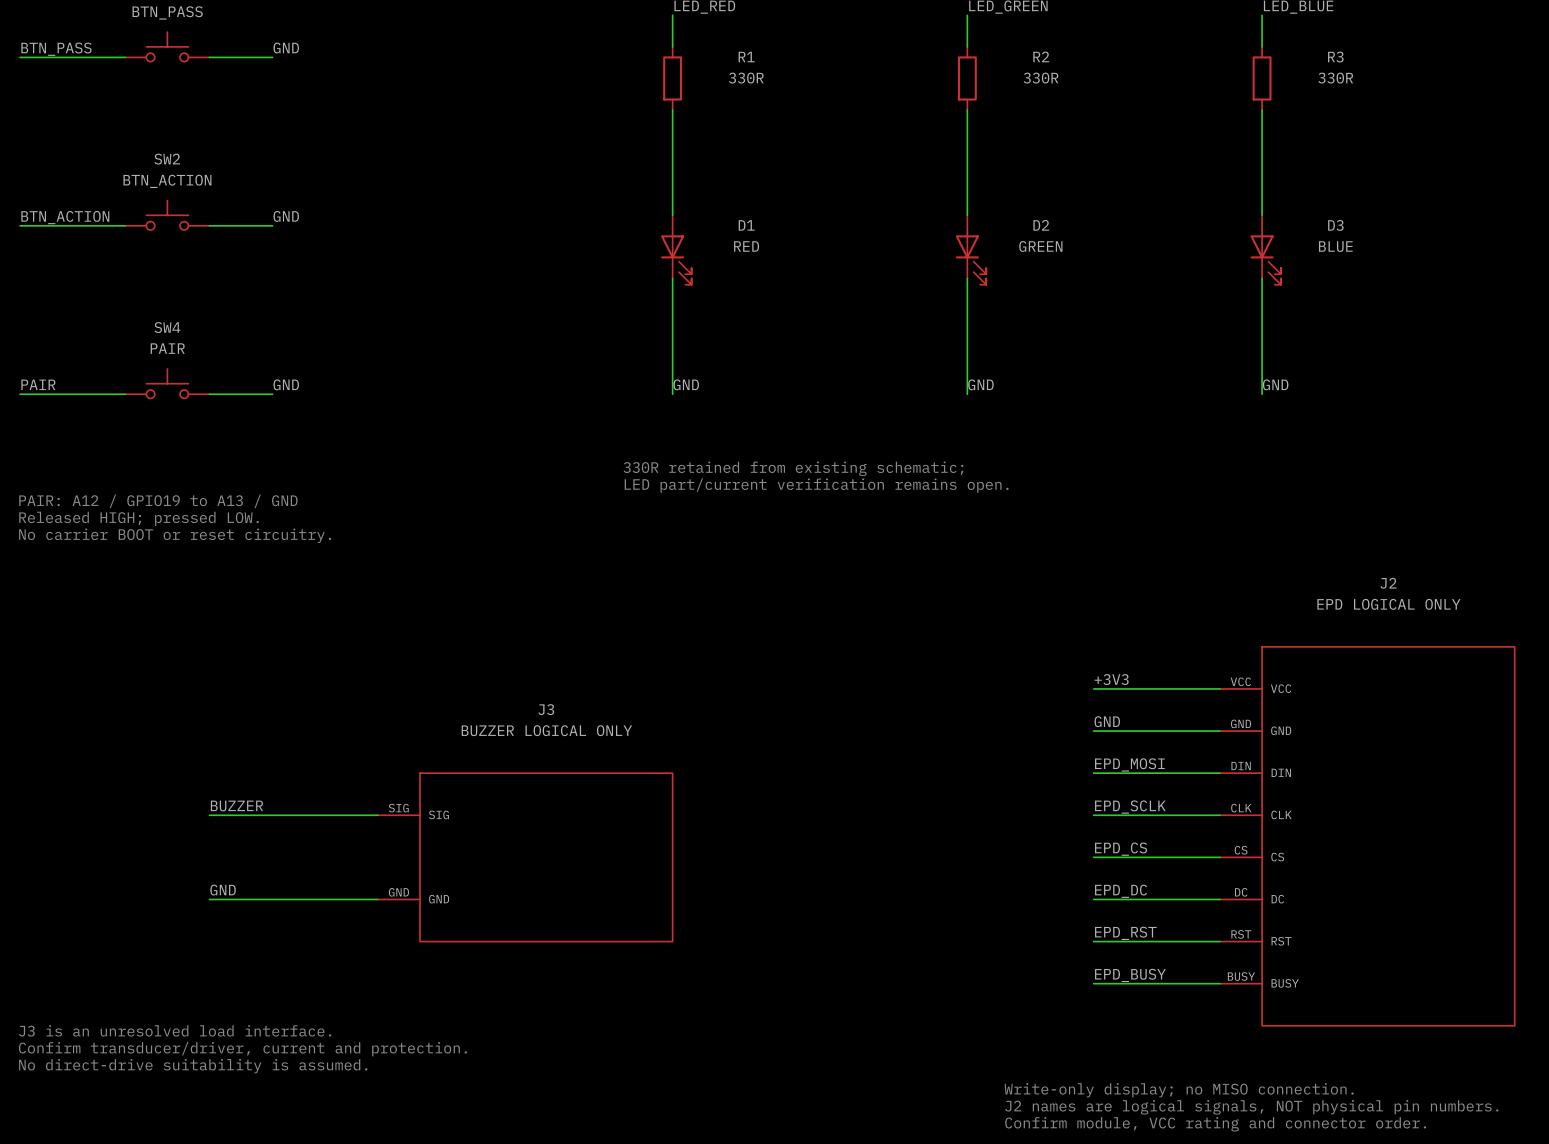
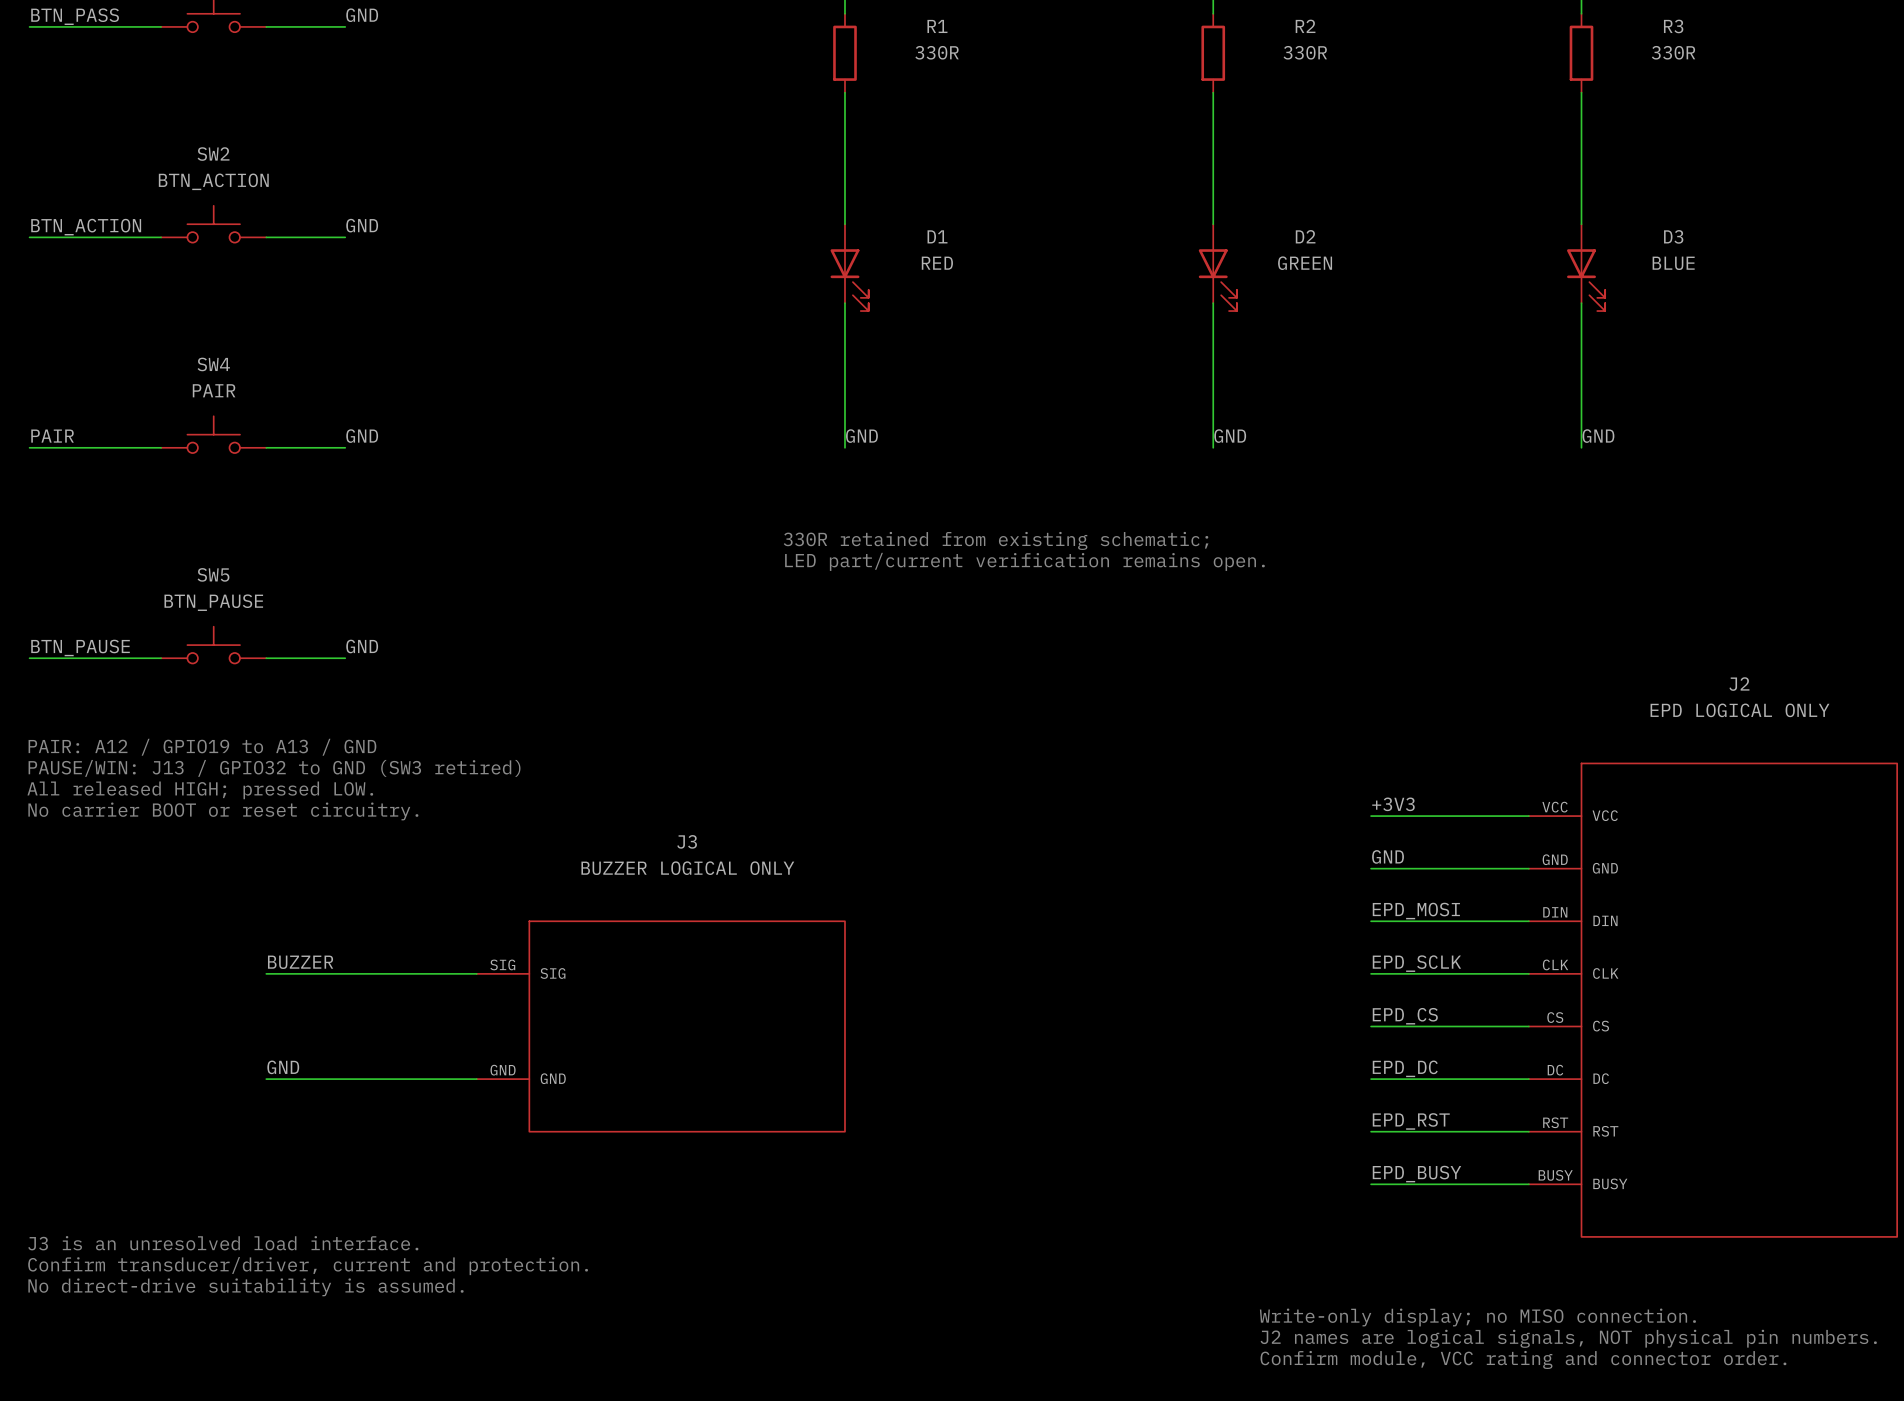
text position: PAIR: A12 / GPIO19 to A13 / GND (158, 501) -> PAIR: A12 / GPIO19 to A13 / GND (202, 747)
text: Released HIGH; pressed LOW. (139, 518) -> none
text position: No carrier BOOT or reset circuitry. (175, 535) -> No carrier BOOT or reset circuitry. (223, 811)
SW5: none -> BTN_PAUSE (213, 645)
label: none -> GND (362, 646)
label: none -> BTN_PAUSE (80, 647)
wire: none -> (29, 658) (161, 658)
wire: none -> (266, 658) (345, 658)
text: none -> PAUSE/WIN: J13 / GPIO32 to GND (SW3 retired) (274, 768)
text: none -> All released HIGH; pressed LOW. (200, 790)

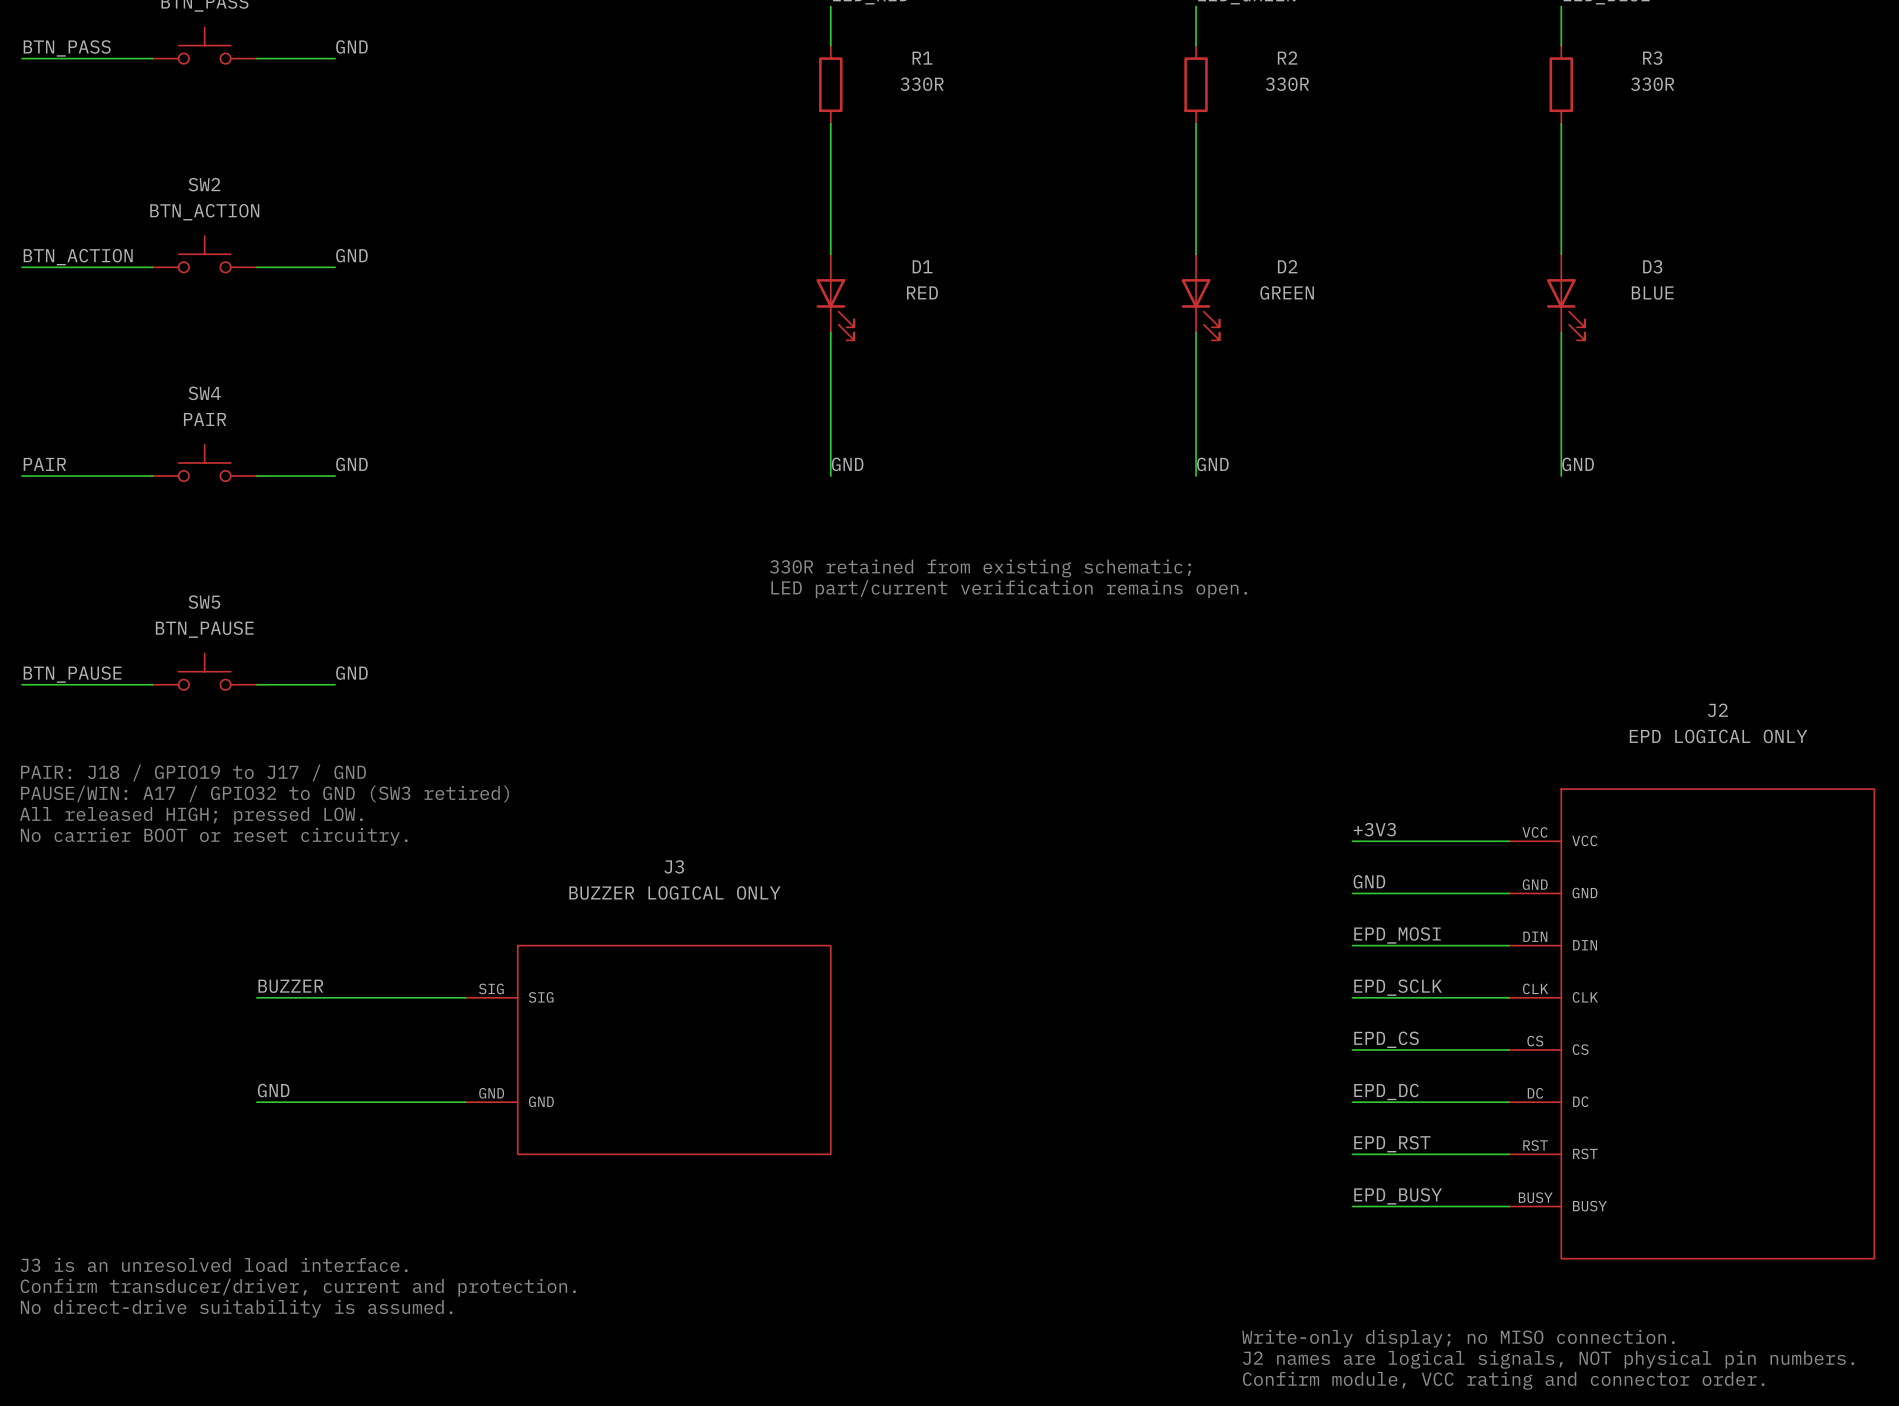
text: PAIR: A12 / GPIO19 to A13 / GND (202, 747) -> PAIR: J18 / GPIO19 to J17 / GND (193, 773)
text: PAUSE/WIN: J13 / GPIO32 to GND (SW3 retired) (274, 768) -> PAUSE/WIN: A17 / GPIO32 to GND (SW3 retired) (265, 794)

